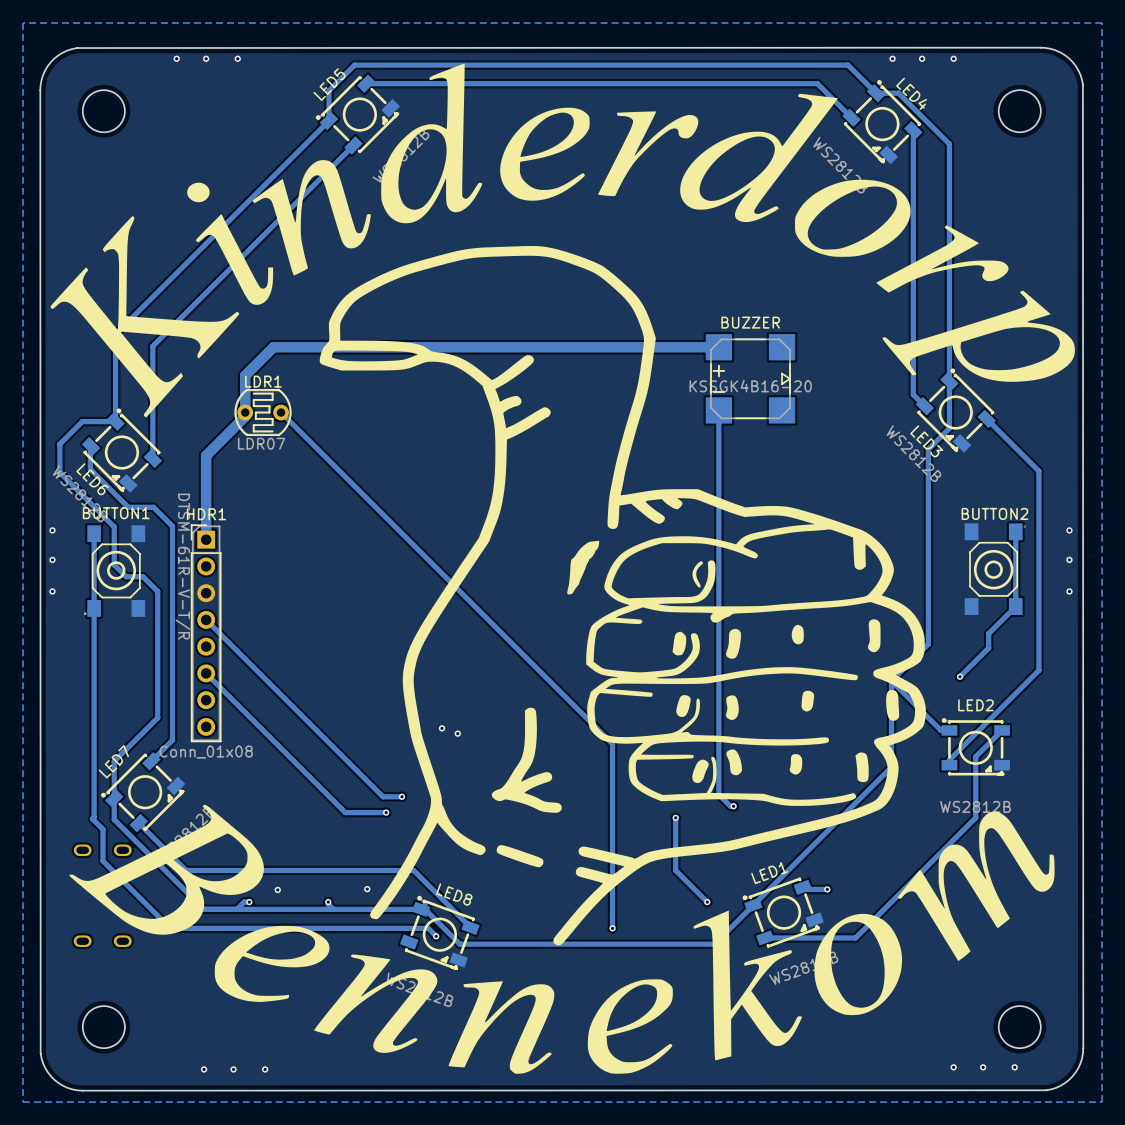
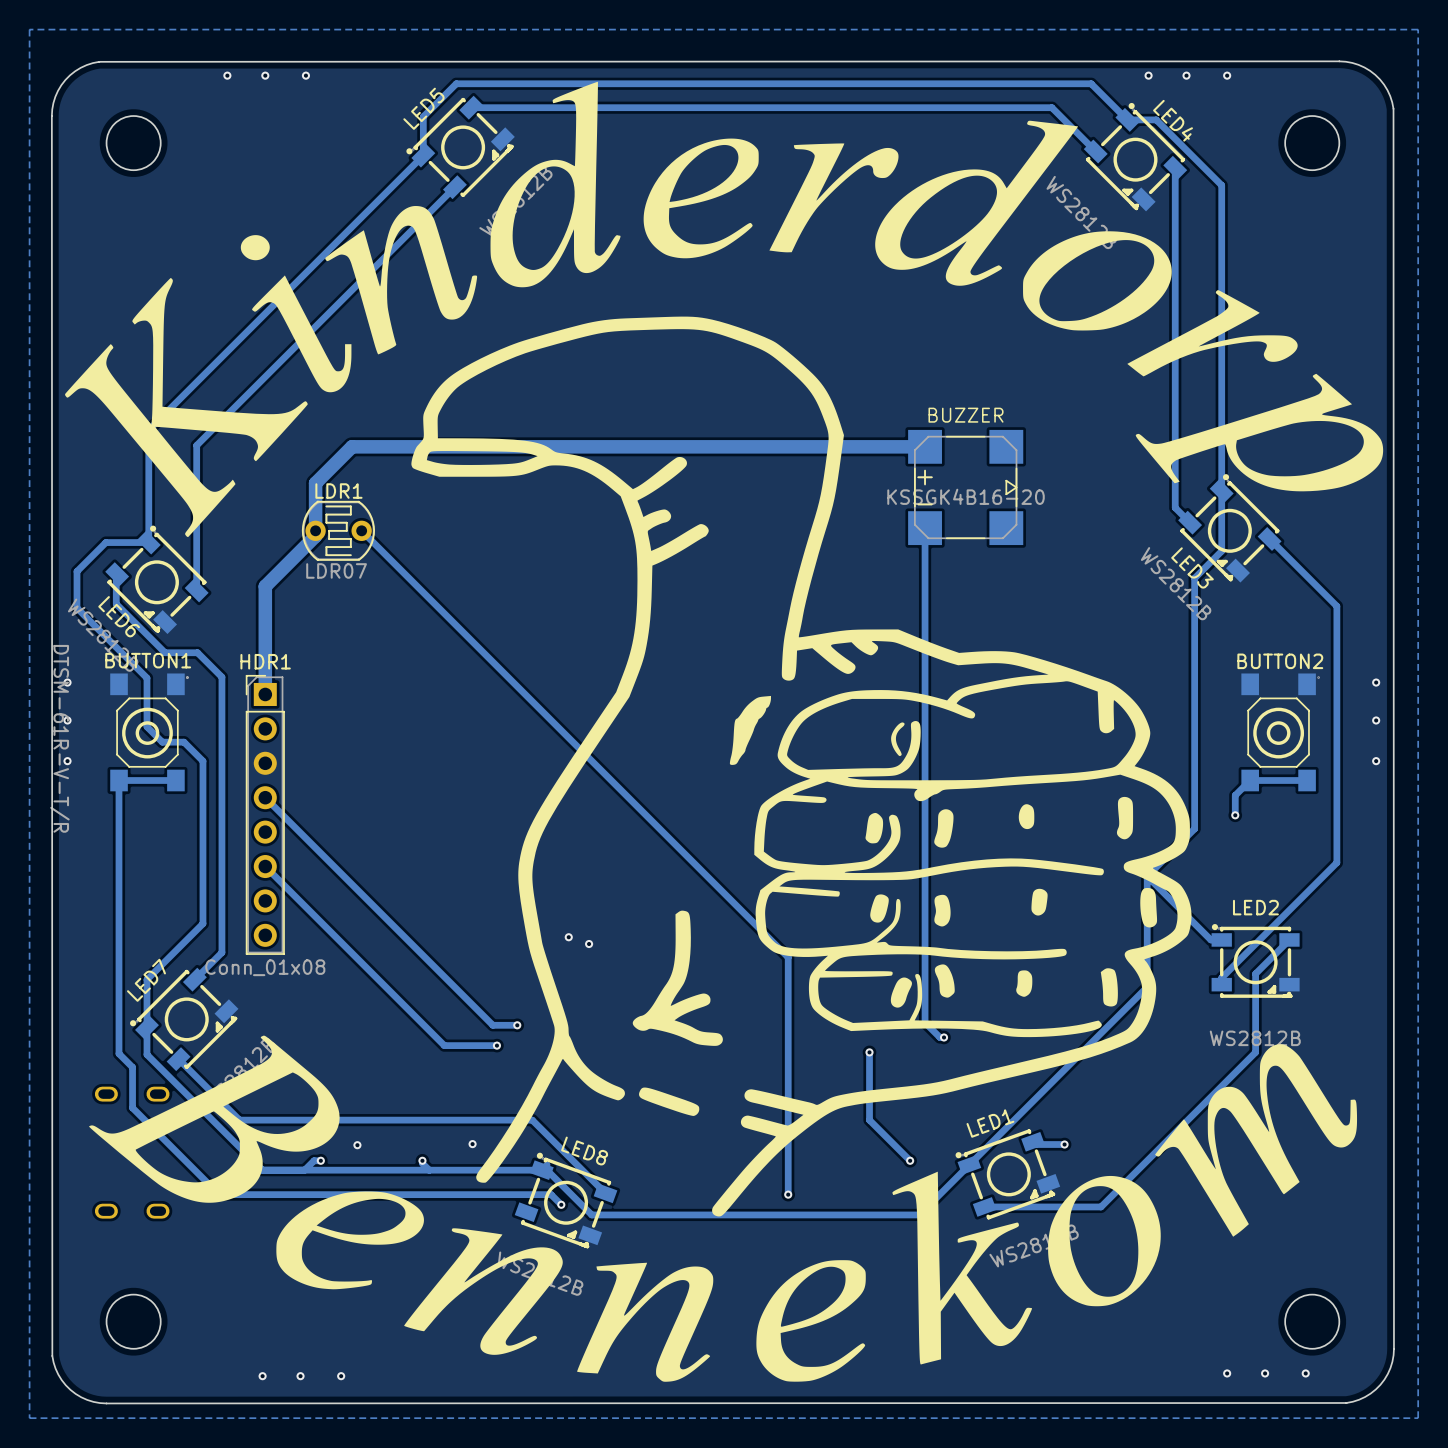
track: (1015, 531) (1015, 606) (988, 633) (988, 648) (959, 676) -> none
track: (94, 533) (94, 817) (92, 818) -> (175, 780) (118, 780) (118, 1053)
BUTTON1 rotation: 0° (114, 571) -> 180° (149, 732)
track: none -> (1307, 780) (1250, 780) (1235, 795) (1235, 815)
via position: (959, 676) -> (1235, 815)

